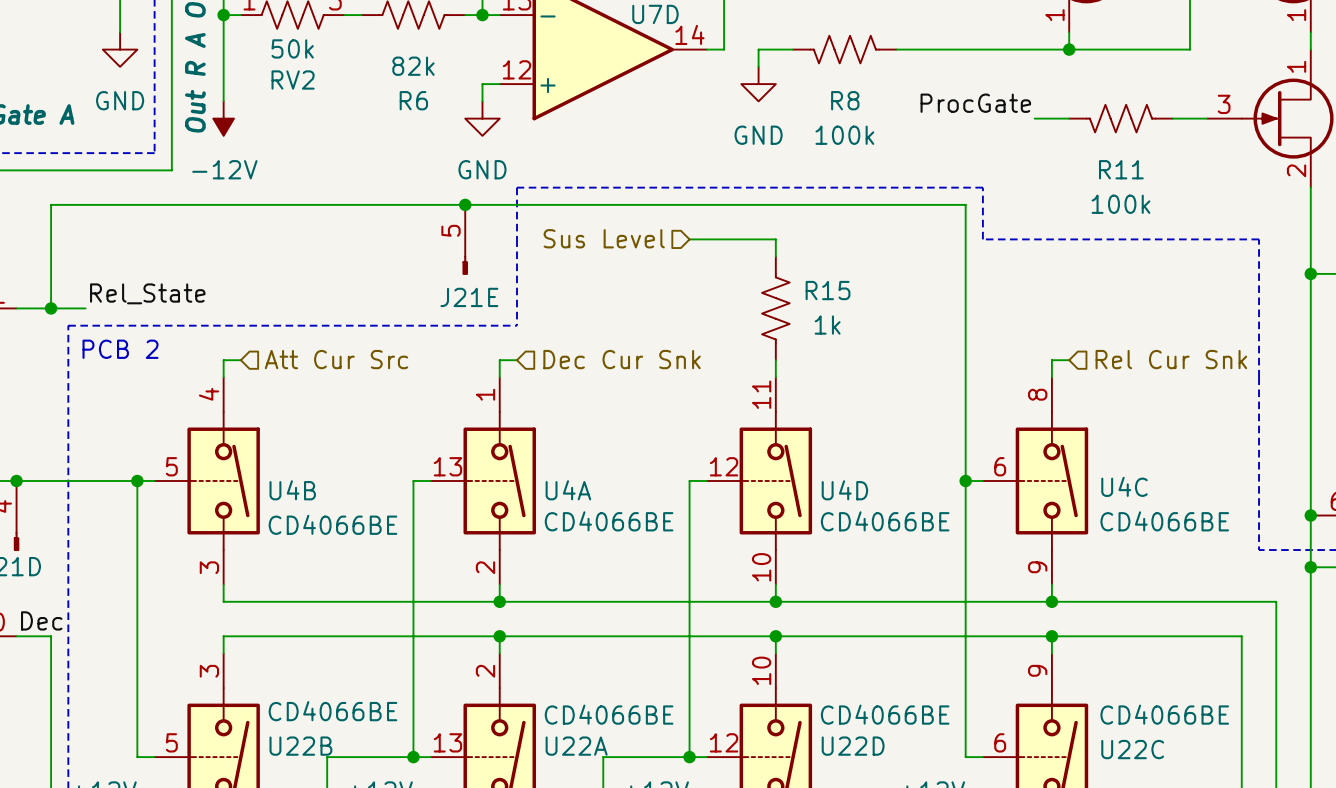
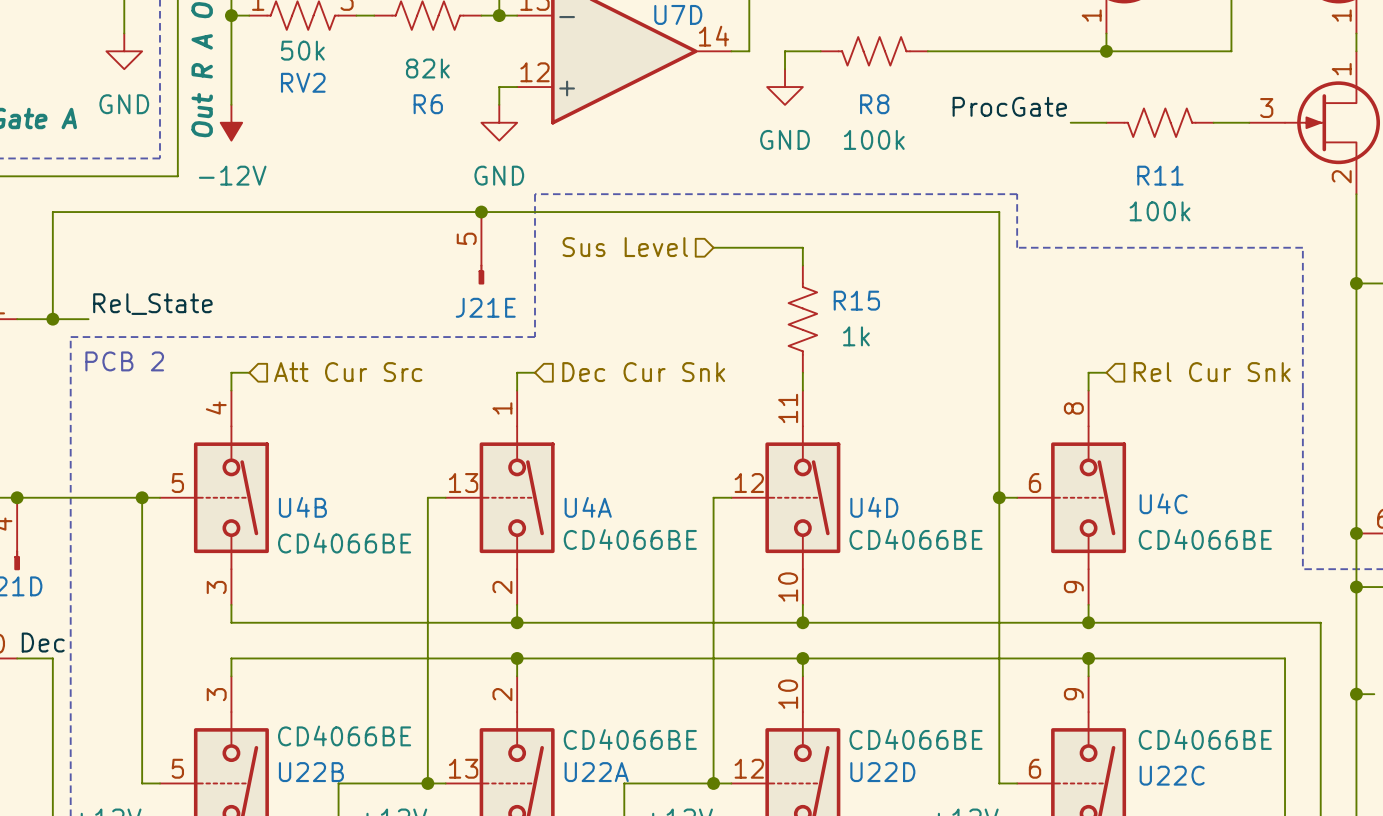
wire: none -> (1356, 694) (1374, 694)
junction: none -> (1356, 694)

